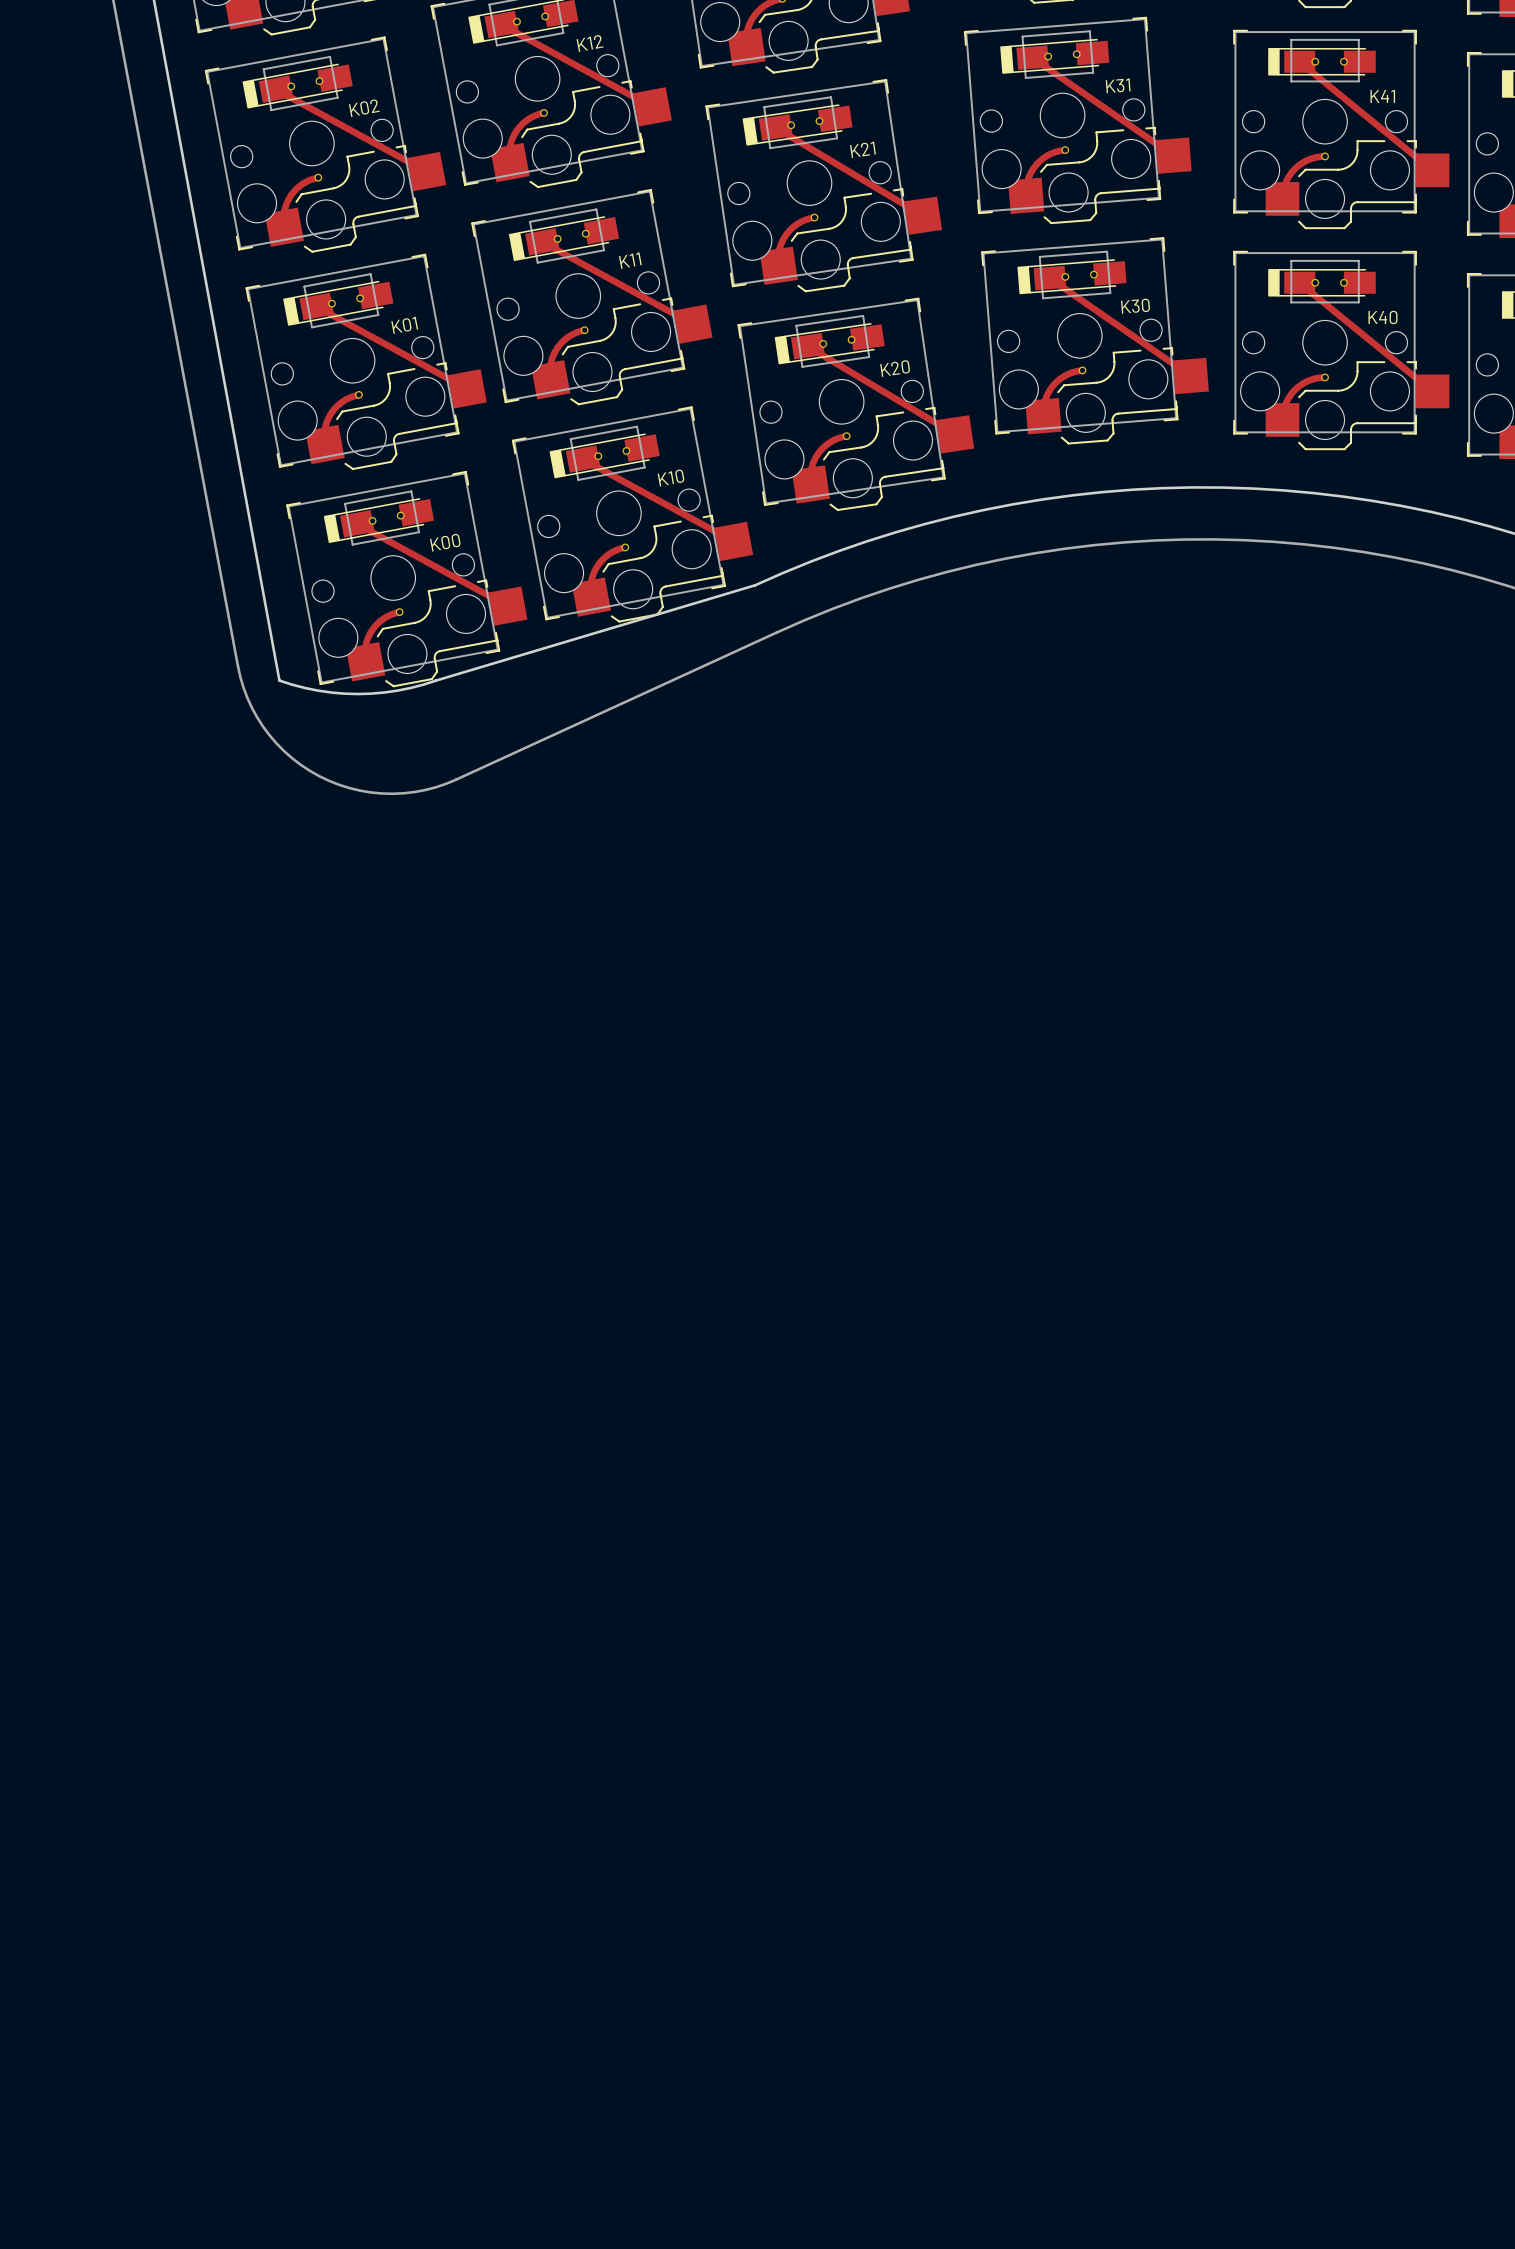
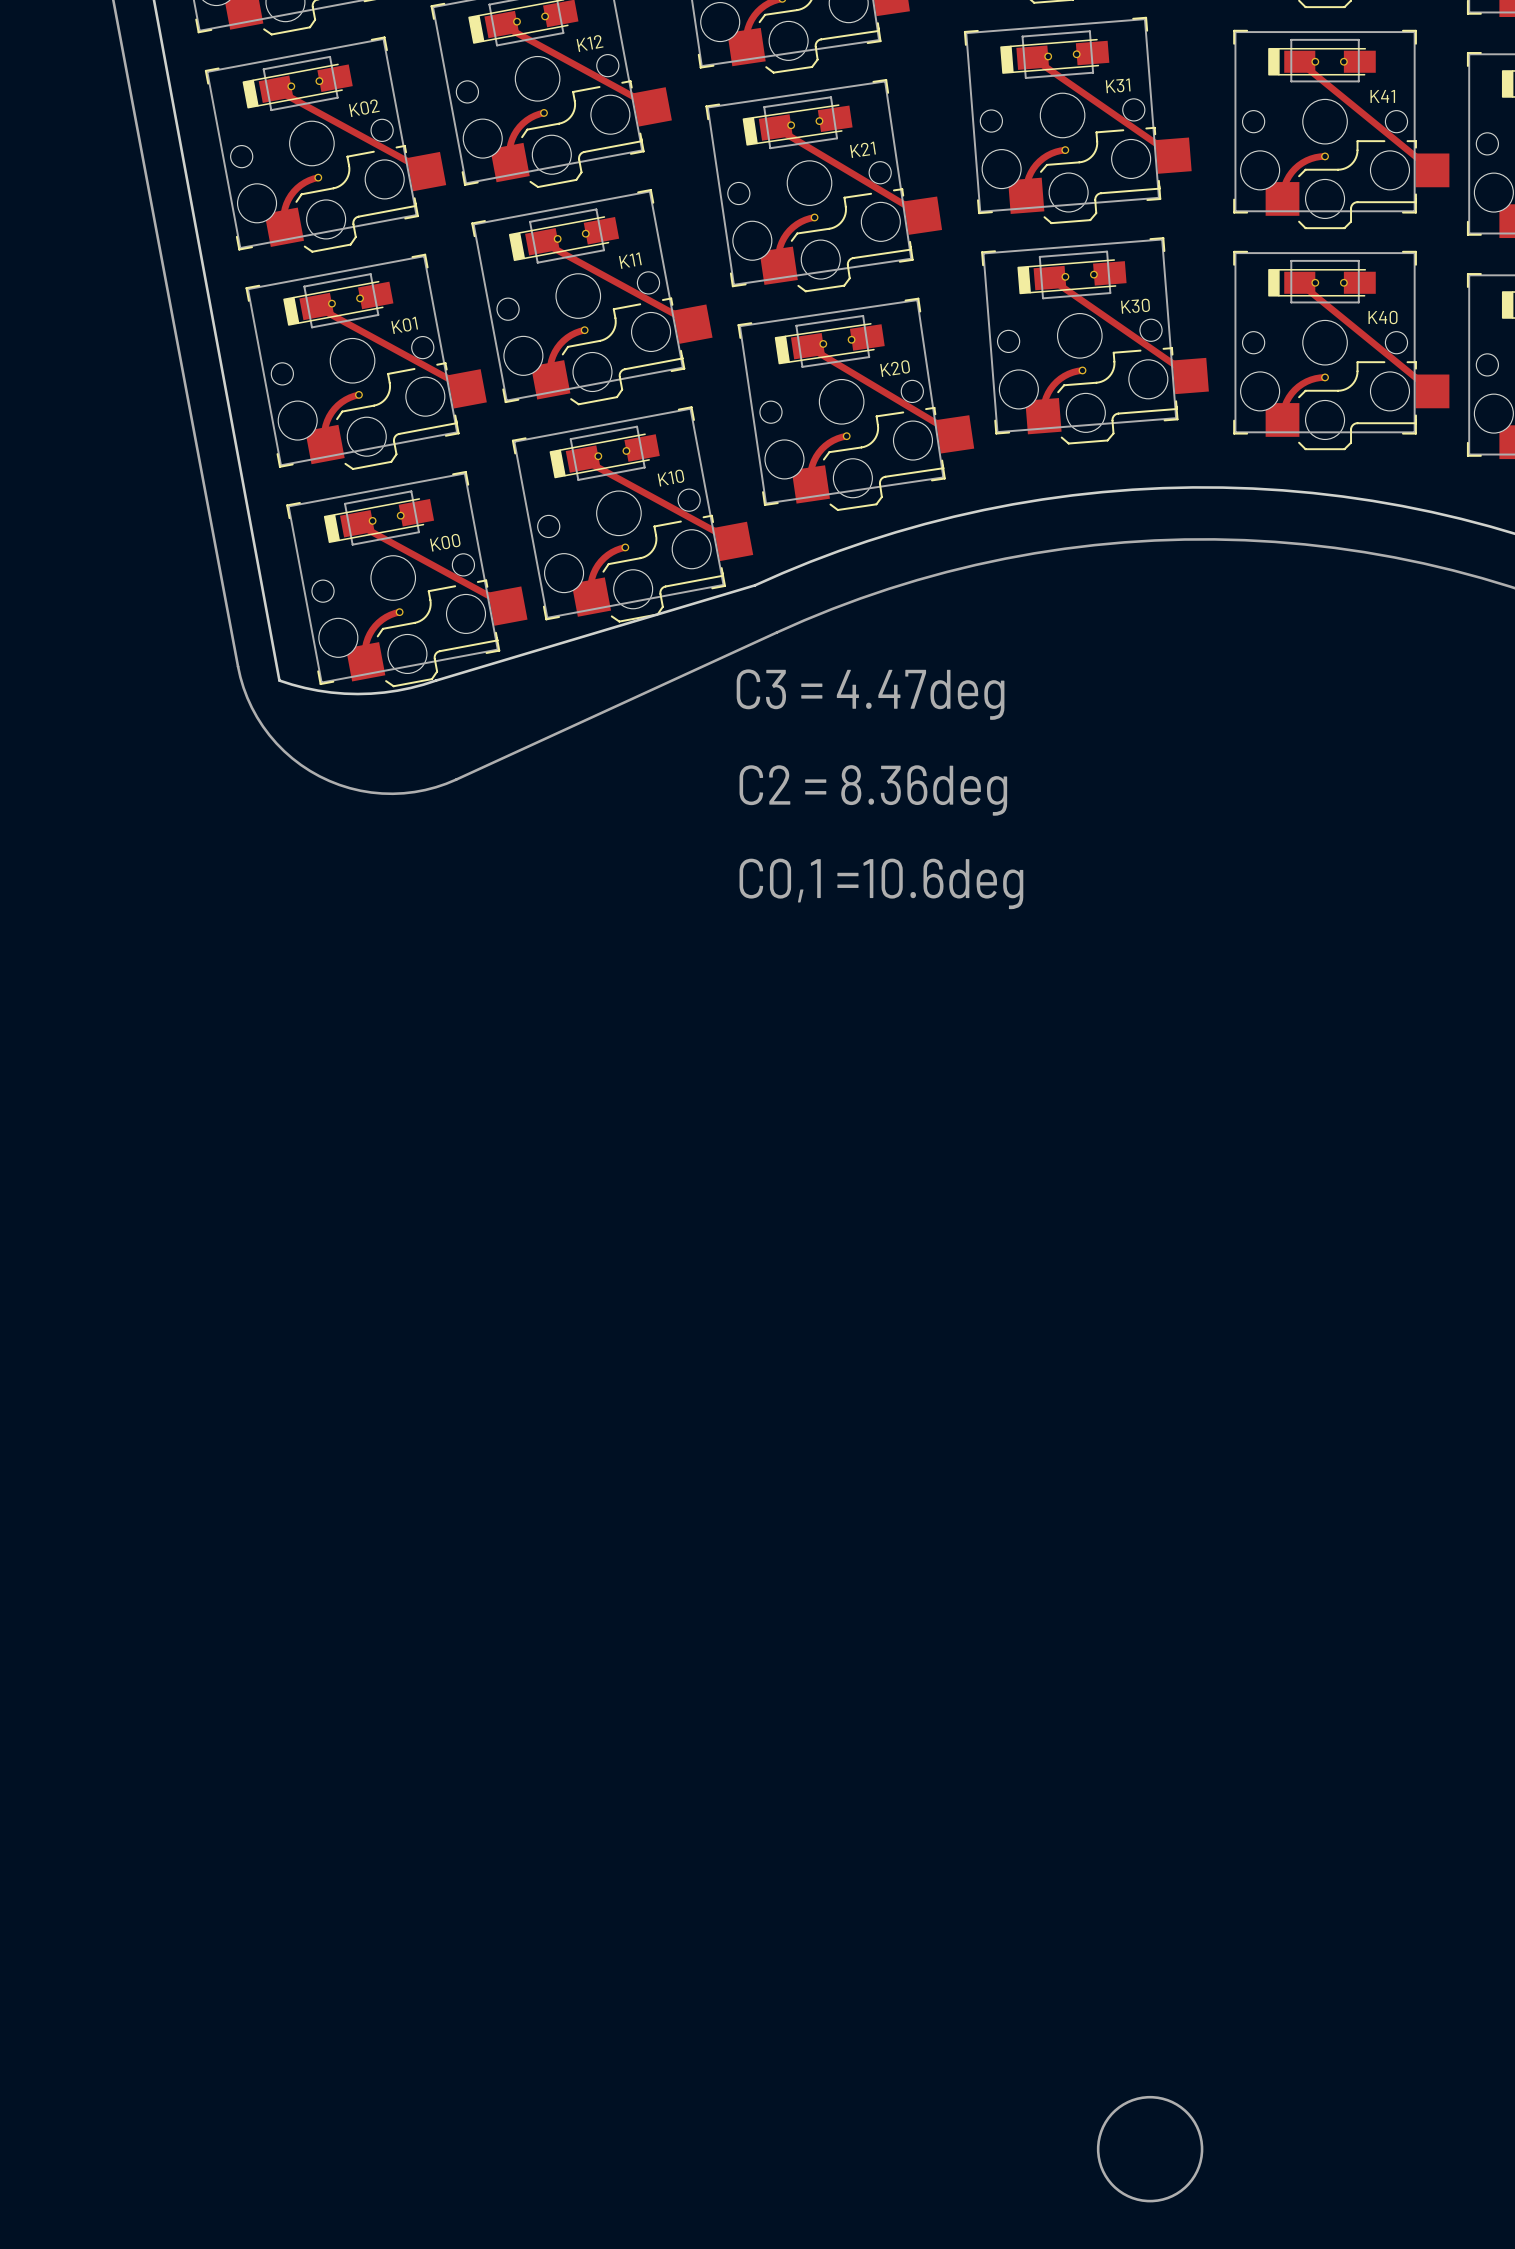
text: none -> C3 = 4.47deg (870, 694)
text: none -> C2 = 8.36deg (873, 790)
text: none -> C0,1 =10.6deg (881, 883)
drawing: none -> [1096, 2095, 1204, 2203]

